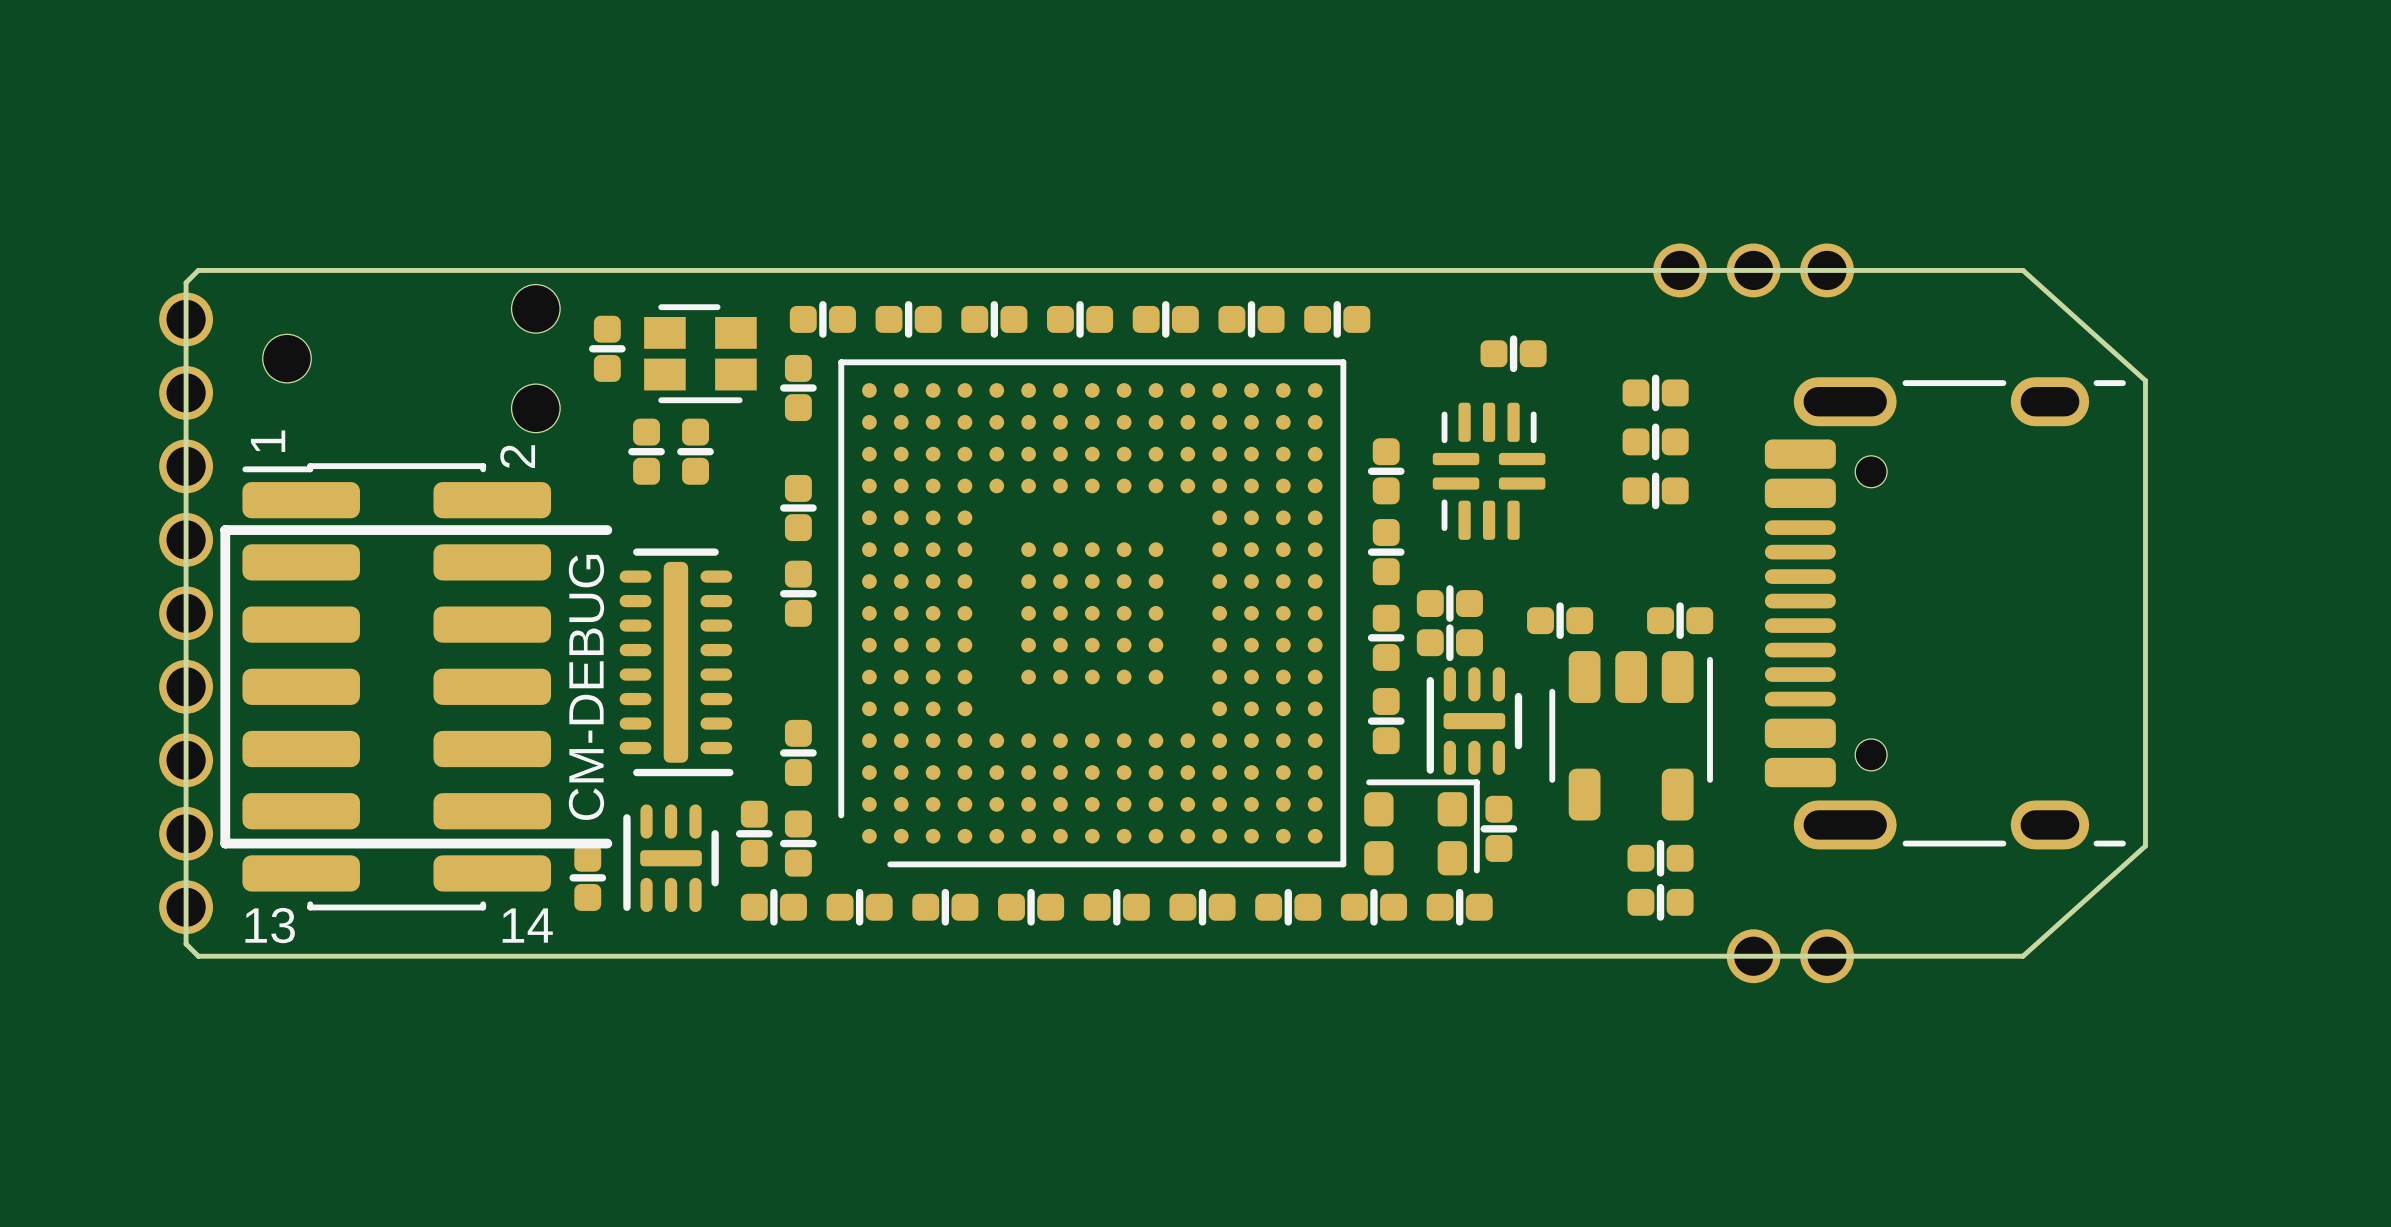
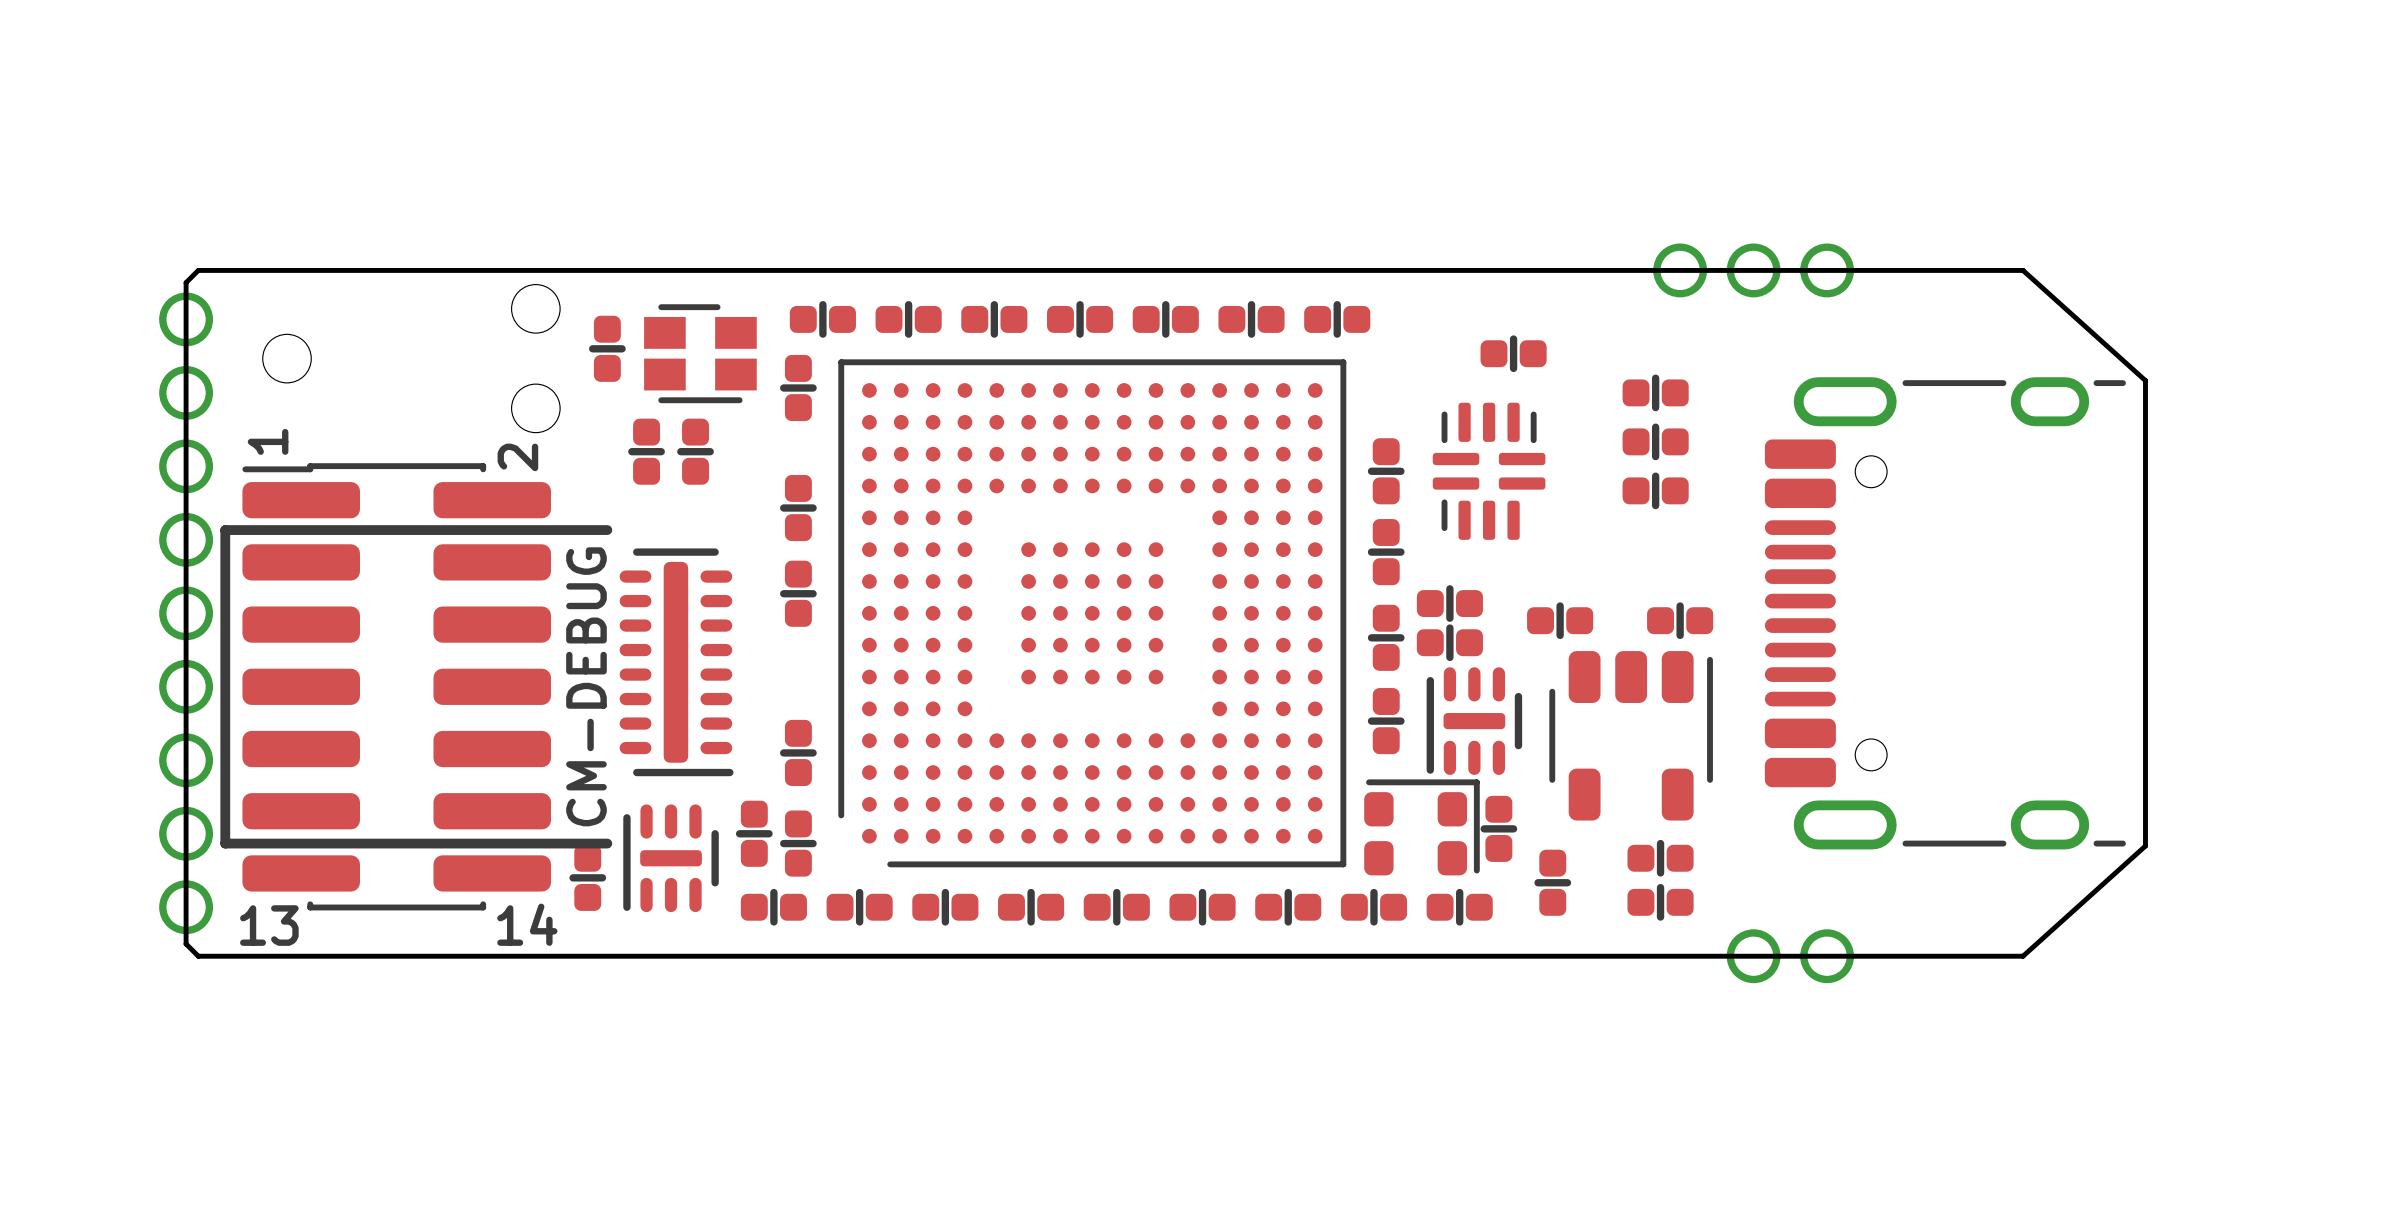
part: none -> (1552, 882)

